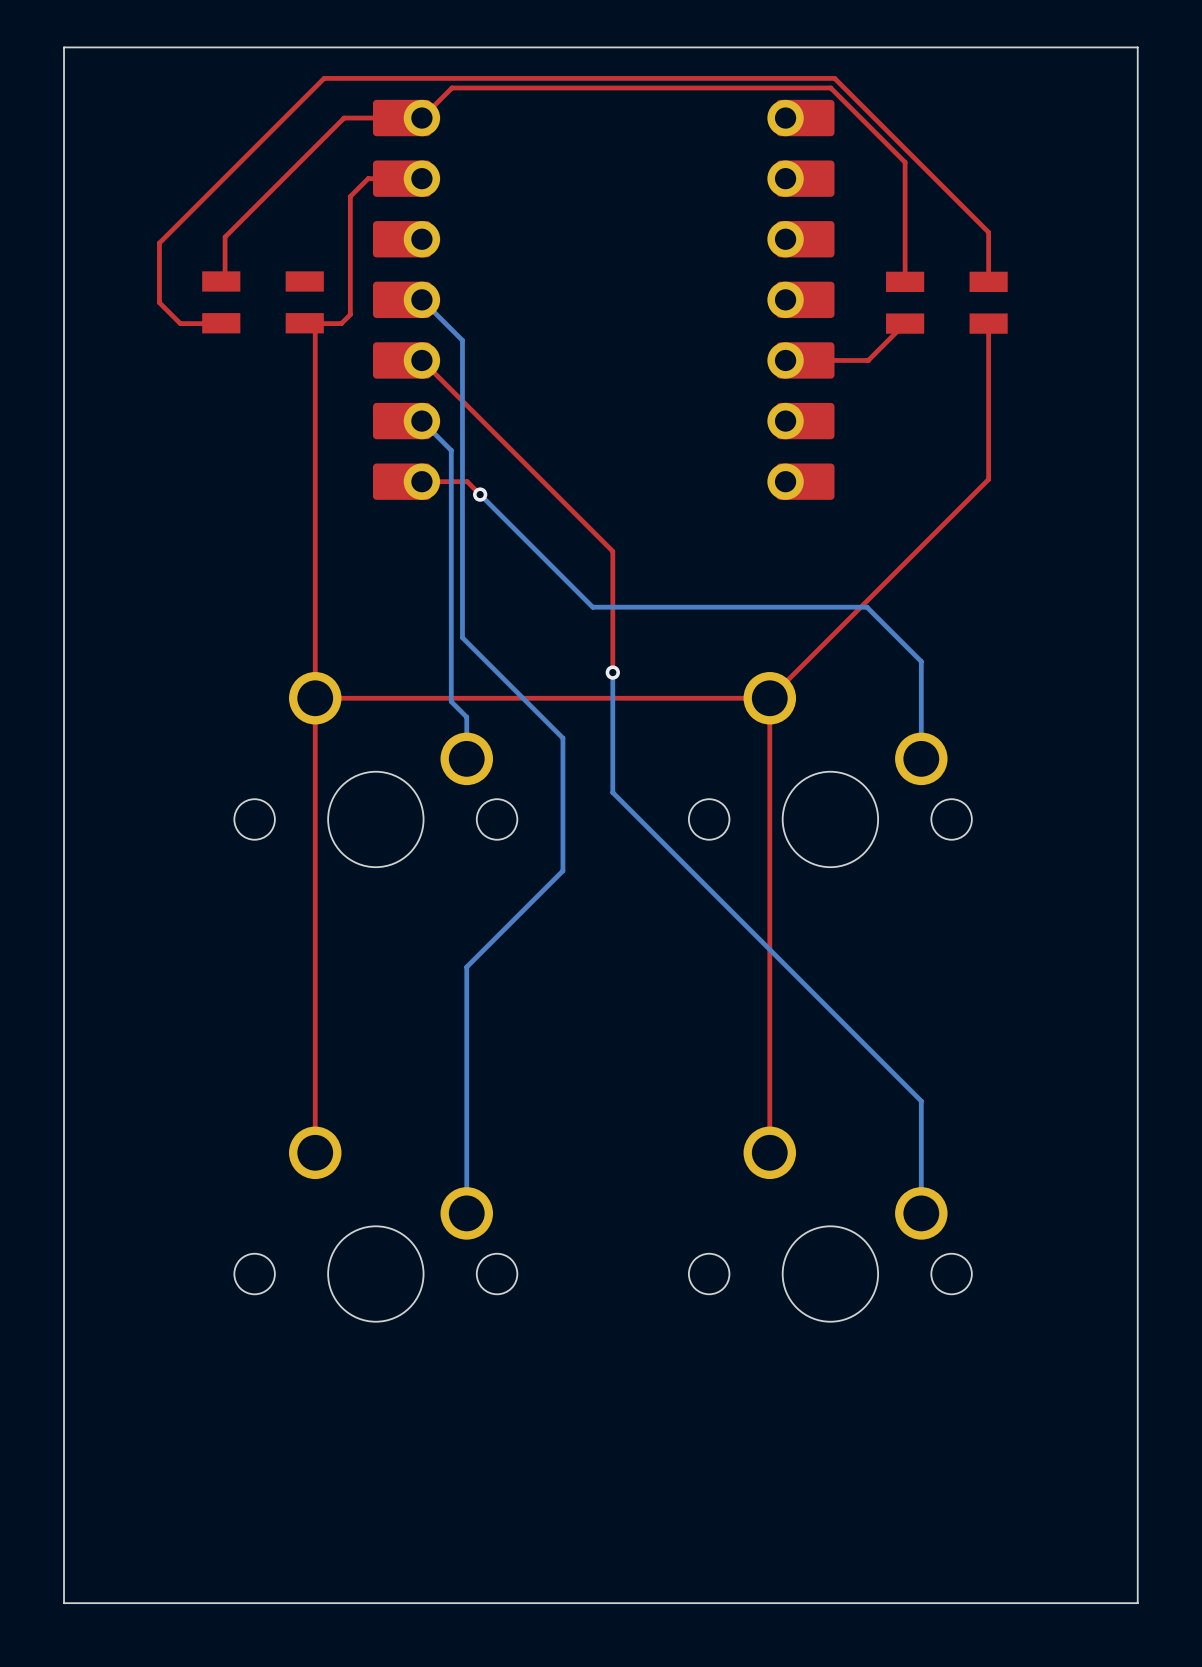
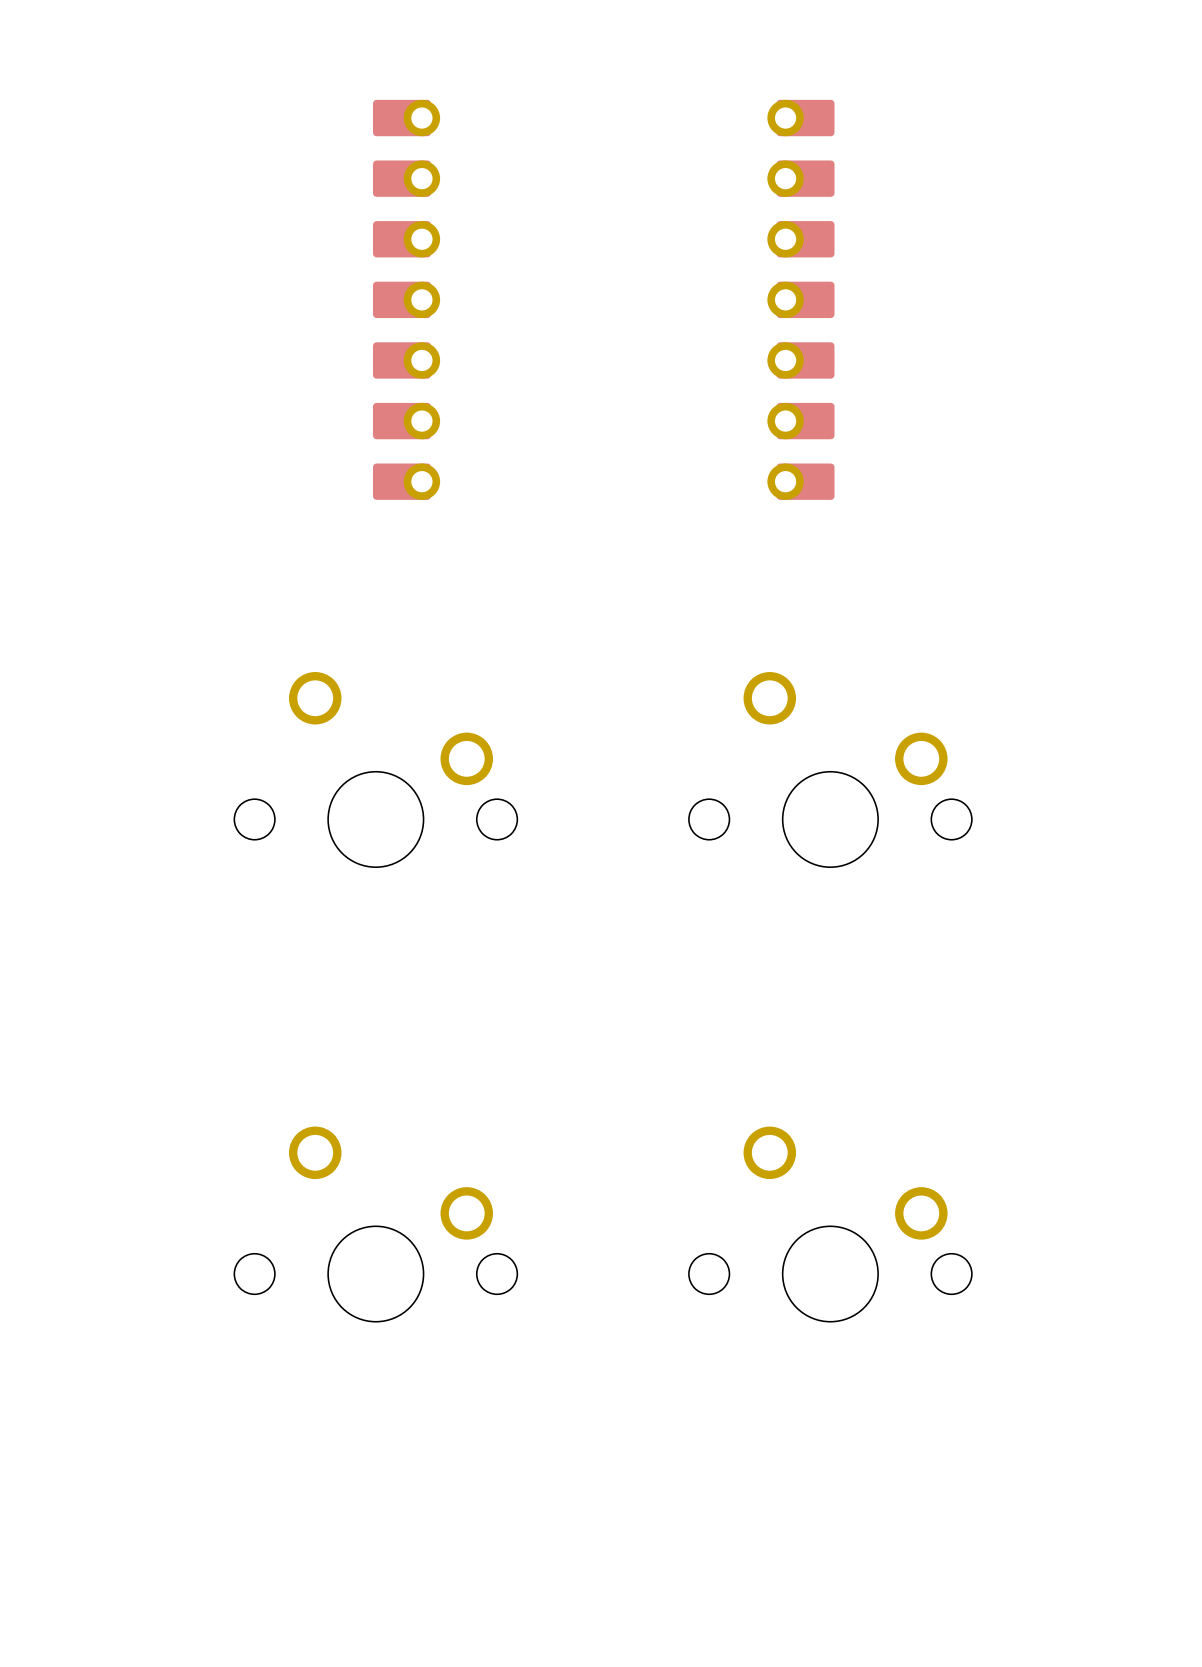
board edge: (1137, 47) (64, 47) (64, 1603) (1137, 1603) (1137, 47) -> none
top track: (402, 118) (344, 118) (225, 237) (225, 281) -> none
top track: (421, 118) (451, 87) (830, 87) (905, 162) (905, 281) -> none
top track: (402, 178) (368, 178) (350, 196) (350, 314) (341, 323) (308, 323) (315, 330) (315, 1152) -> none
top track: (988, 281) (988, 232) (834, 78) (324, 78) (159, 243) (159, 302) (180, 323) (225, 323) -> none
bottom track: (421, 299) (462, 340) (462, 637) (562, 738) (562, 870) (466, 967) (466, 1213) -> none
part: (263, 302) -> none
part: (946, 302) -> none
top track: (905, 323) (868, 360) (805, 360) -> none
top track: (988, 323) (988, 479) (769, 698) -> none
top track: (421, 360) (612, 551) (612, 672) -> none
bottom track: (421, 421) (451, 450) (451, 701) (466, 717) (466, 758) -> none
top track: (421, 481) (467, 481) (480, 494) -> none
bottom track: (480, 494) (592, 607) (866, 607) (921, 661) (921, 758) -> none
via: (480, 494) -> none
bottom track: (612, 672) (612, 792) (921, 1101) (921, 1213) -> none
via: (612, 672) -> none
top track: (769, 698) (315, 698) -> none
top track: (769, 698) (769, 1152) -> none

